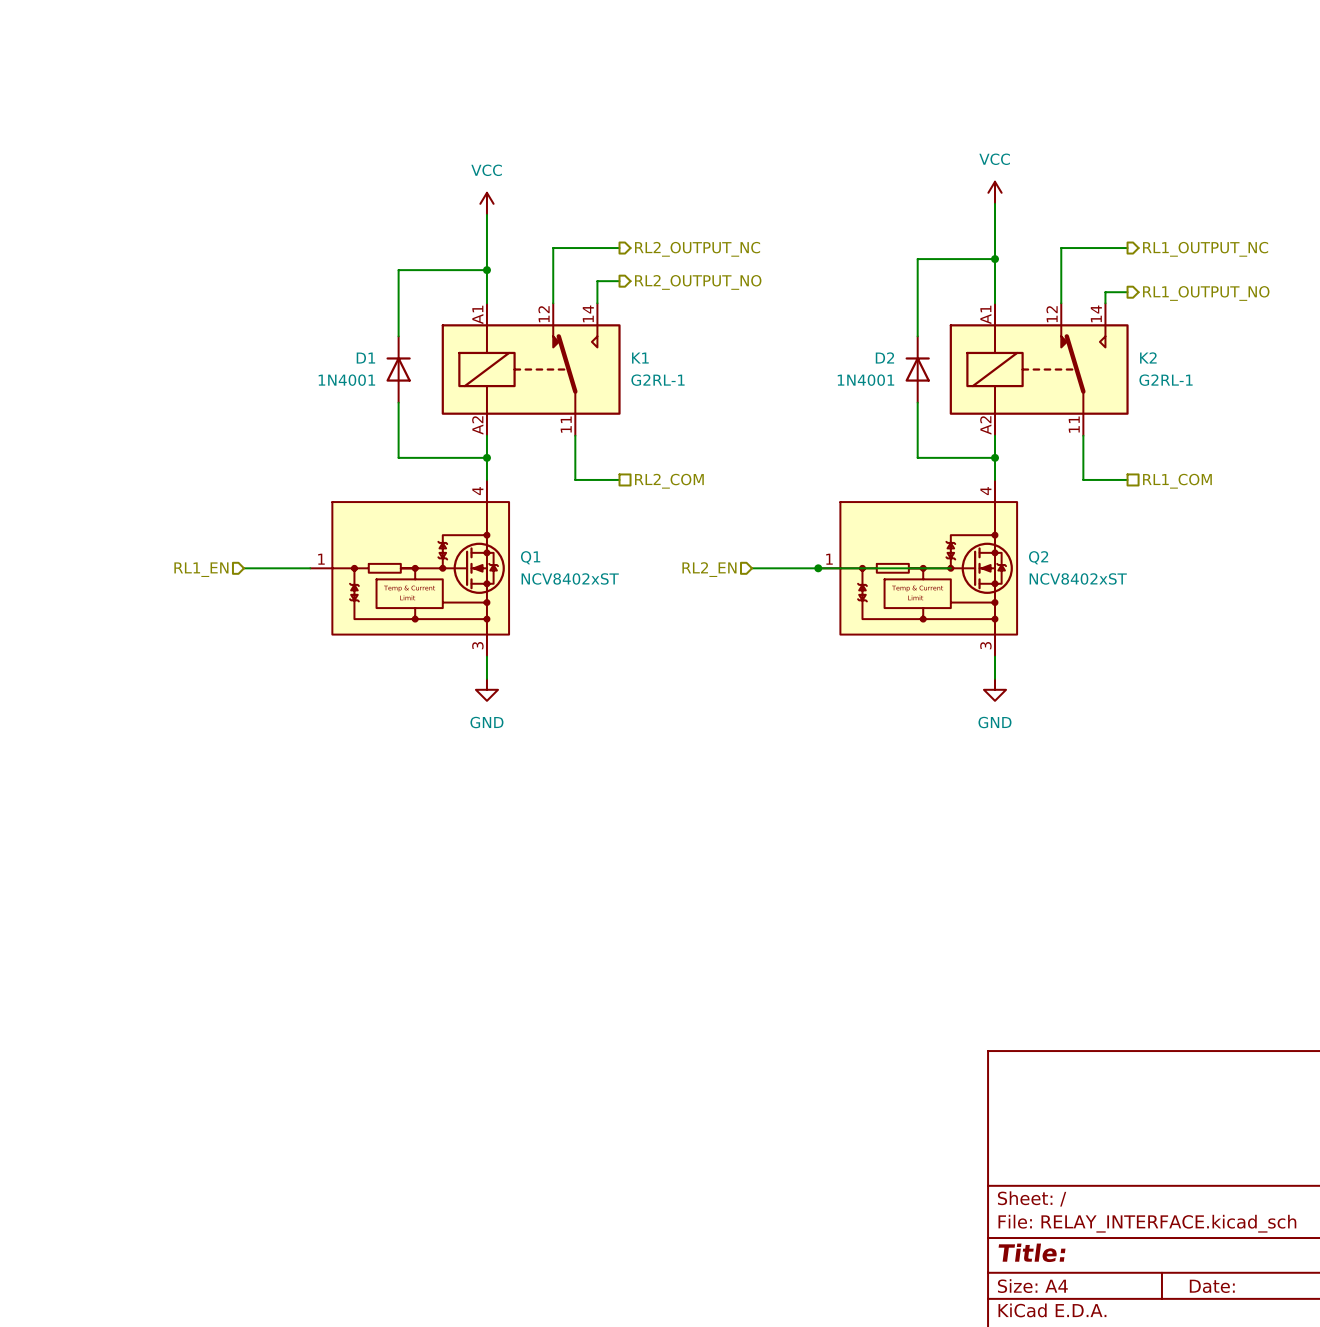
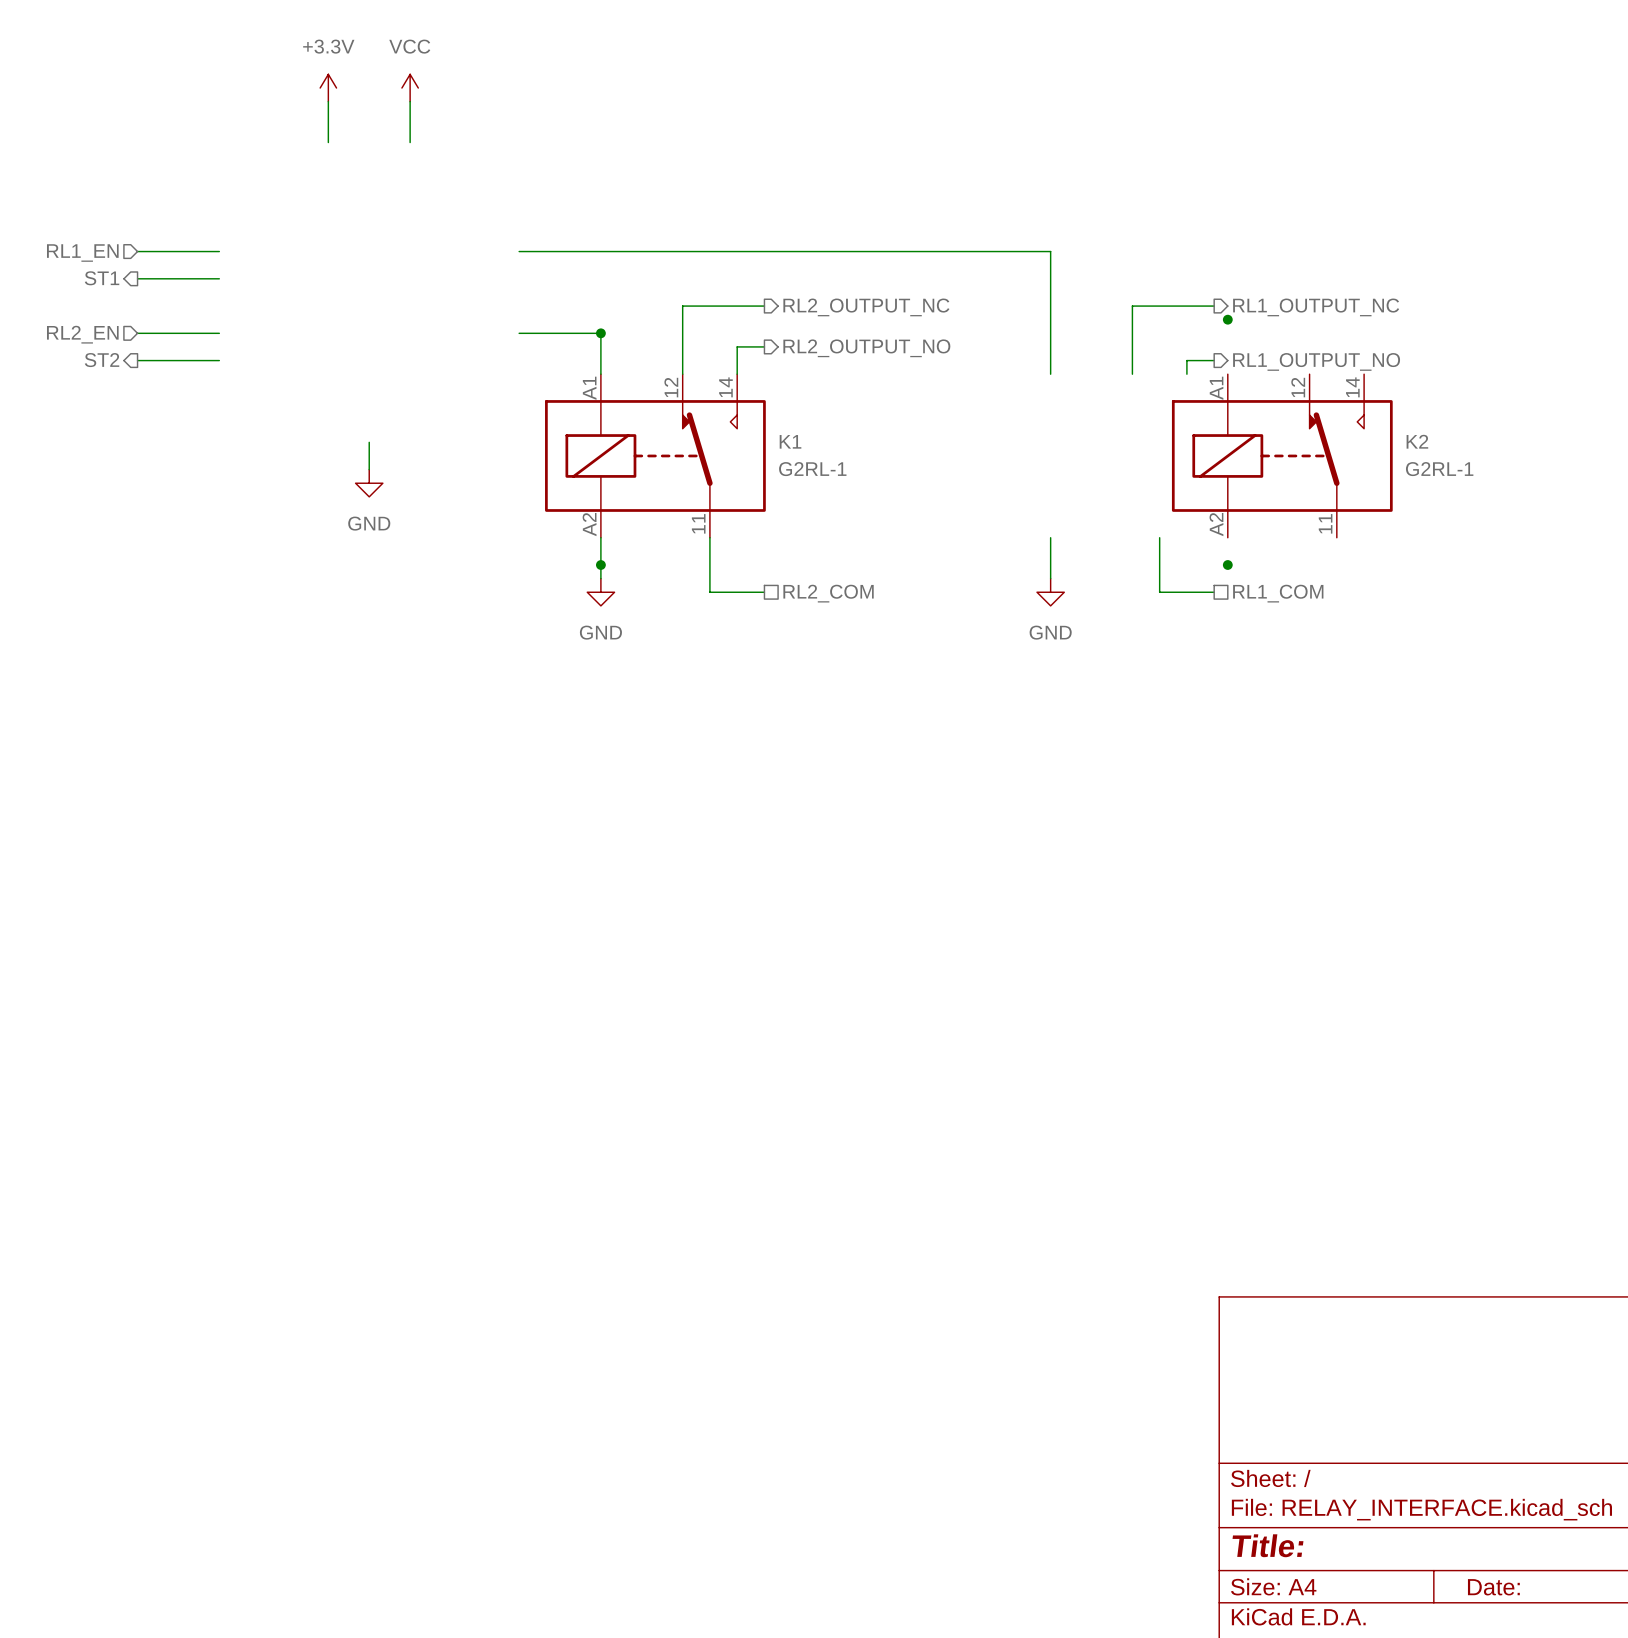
power symbol: none -> +3.3V (328, 88)
wire: none -> (328, 101) (328, 142)
wire: none -> (410, 101) (410, 142)
power symbol: VCC (995, 192) -> none
wire: none -> (137, 251) (219, 251)
wire: none -> (519, 251) (1050, 251) (1050, 374)
power symbol position: VCC (486, 203) -> VCC (410, 88)
wire: (995, 203) (995, 303) -> none
hierarchical label: none -> RL1_EN (82, 253)
wire: (486, 214) (486, 270) -> none
hierarchical label: none -> ST1 (102, 278)
wire: none -> (137, 278) (219, 278)
wire: (1127, 248) (1061, 248) (1061, 303) -> none
hierarchical label position: RL1_OUTPUT_NC (1205, 249) -> RL1_OUTPUT_NC (1316, 307)
wire: (917, 259) (995, 259) -> (1132, 319) (1132, 306) (1214, 306)
wire: none -> (137, 333) (219, 333)
wire: (420, 270) (398, 270) (398, 336) -> none
hierarchical label: none -> RL2_EN (82, 334)
hierarchical label: none -> ST2 (102, 360)
wire: none -> (137, 360) (219, 360)
wire: (1127, 292) (1105, 292) (1105, 303) -> (1214, 360) (1186, 360) (1186, 374)
hierarchical label position: RL1_OUTPUT_NO (1206, 293) -> RL1_OUTPUT_NO (1316, 361)
wire: (917, 303) (917, 336) -> (1050, 537) (1050, 578)
wire: none -> (369, 442) (369, 469)
D1: 1N4001 (398, 369) -> none
D2: 1N4001 (917, 369) -> none
power symbol: none -> GND (369, 483)
wire: (398, 402) (398, 457) (486, 457) -> none
wire: (917, 402) (917, 457) (995, 457) -> none
wire: (995, 435) (995, 479) -> none
wire: (1083, 435) (1083, 479) (1127, 479) -> (1159, 537) (1159, 592) (1214, 592)
power symbol: none -> GND (600, 592)
power symbol: none -> GND (1050, 592)
hierarchical label position: RL1_COM (1177, 481) -> RL1_COM (1278, 593)
wire: (244, 568) (310, 568) -> none
Q1: NCV8402xST (409, 568) -> none
wire: (752, 568) (950, 568) -> none
junction: (818, 568) -> none
Q2: NCV8402xST (917, 568) -> none
hierarchical label: RL1_EN (201, 569) -> none
hierarchical label: RL2_EN (709, 569) -> none
wire: (486, 656) (486, 678) -> none
wire: (995, 656) (995, 678) -> none
power symbol: GND (486, 689) -> none
power symbol: GND (995, 689) -> none

